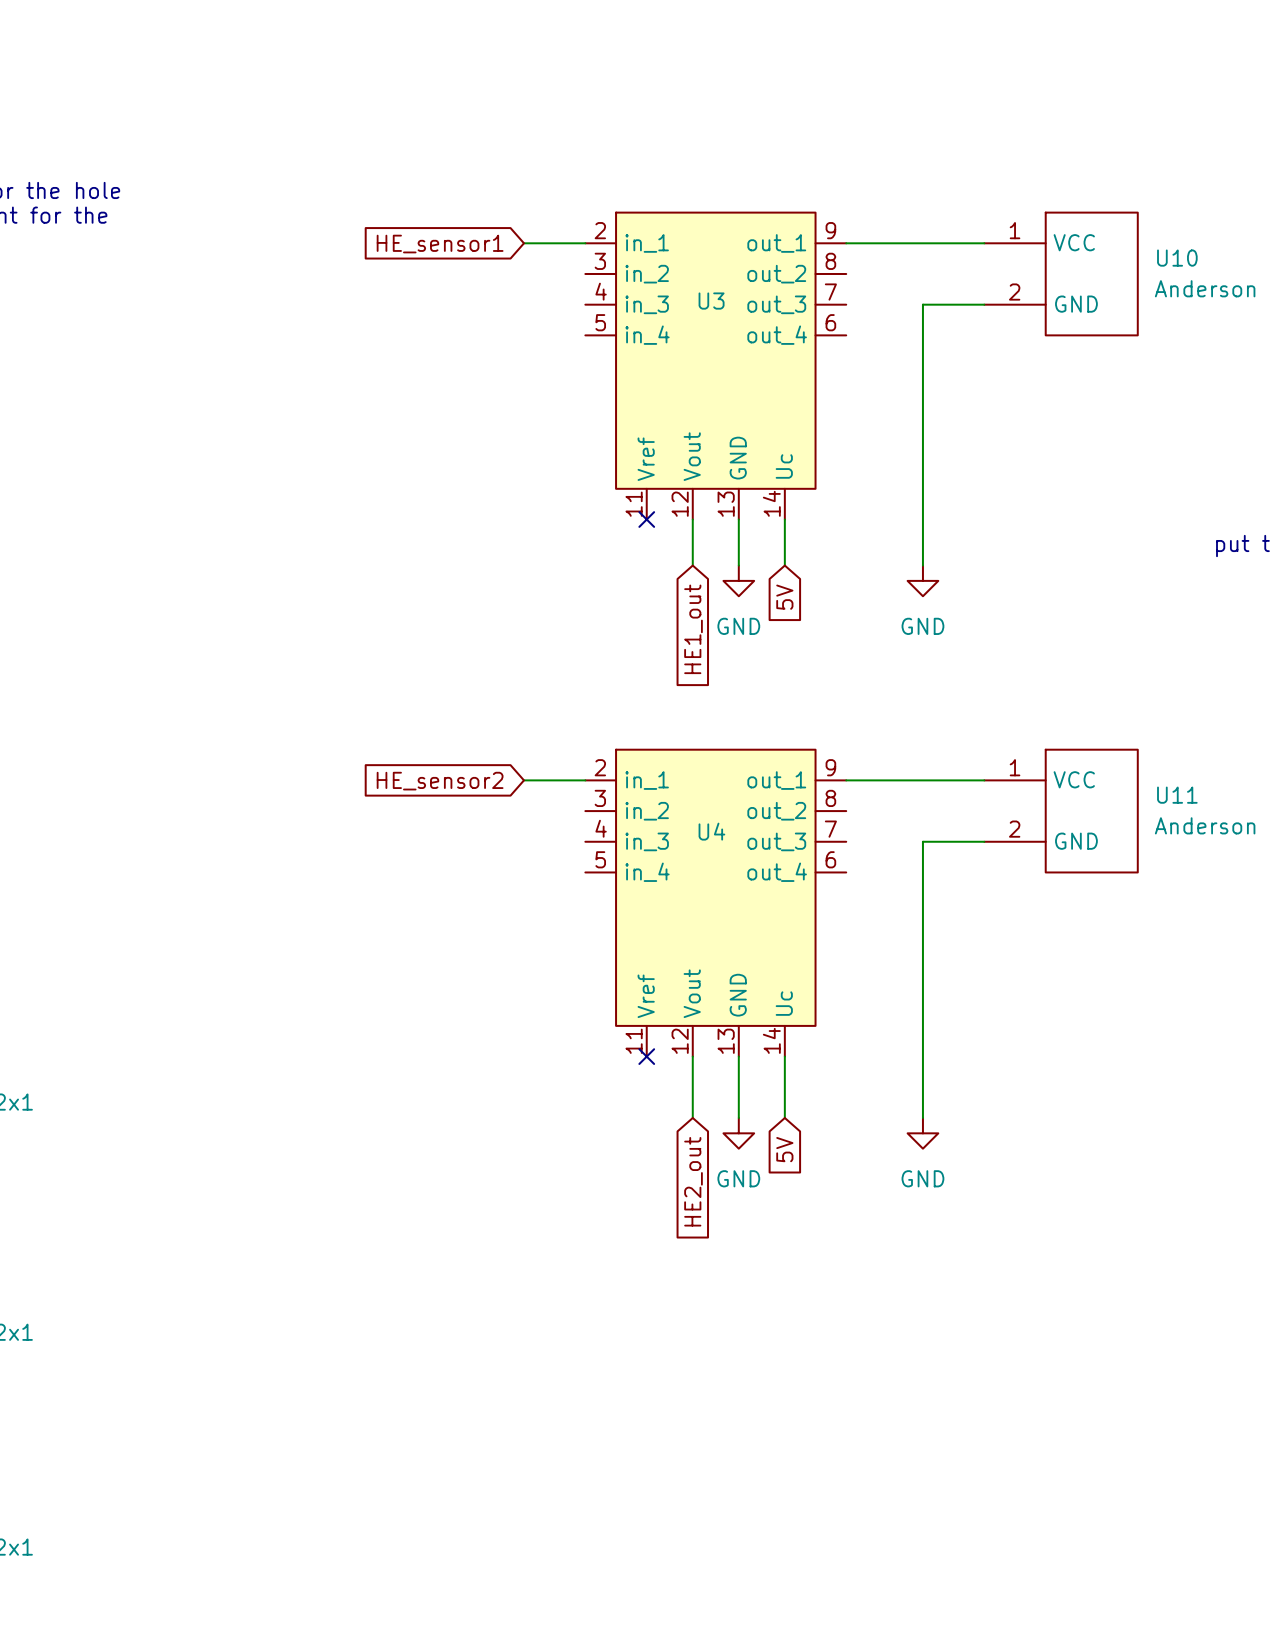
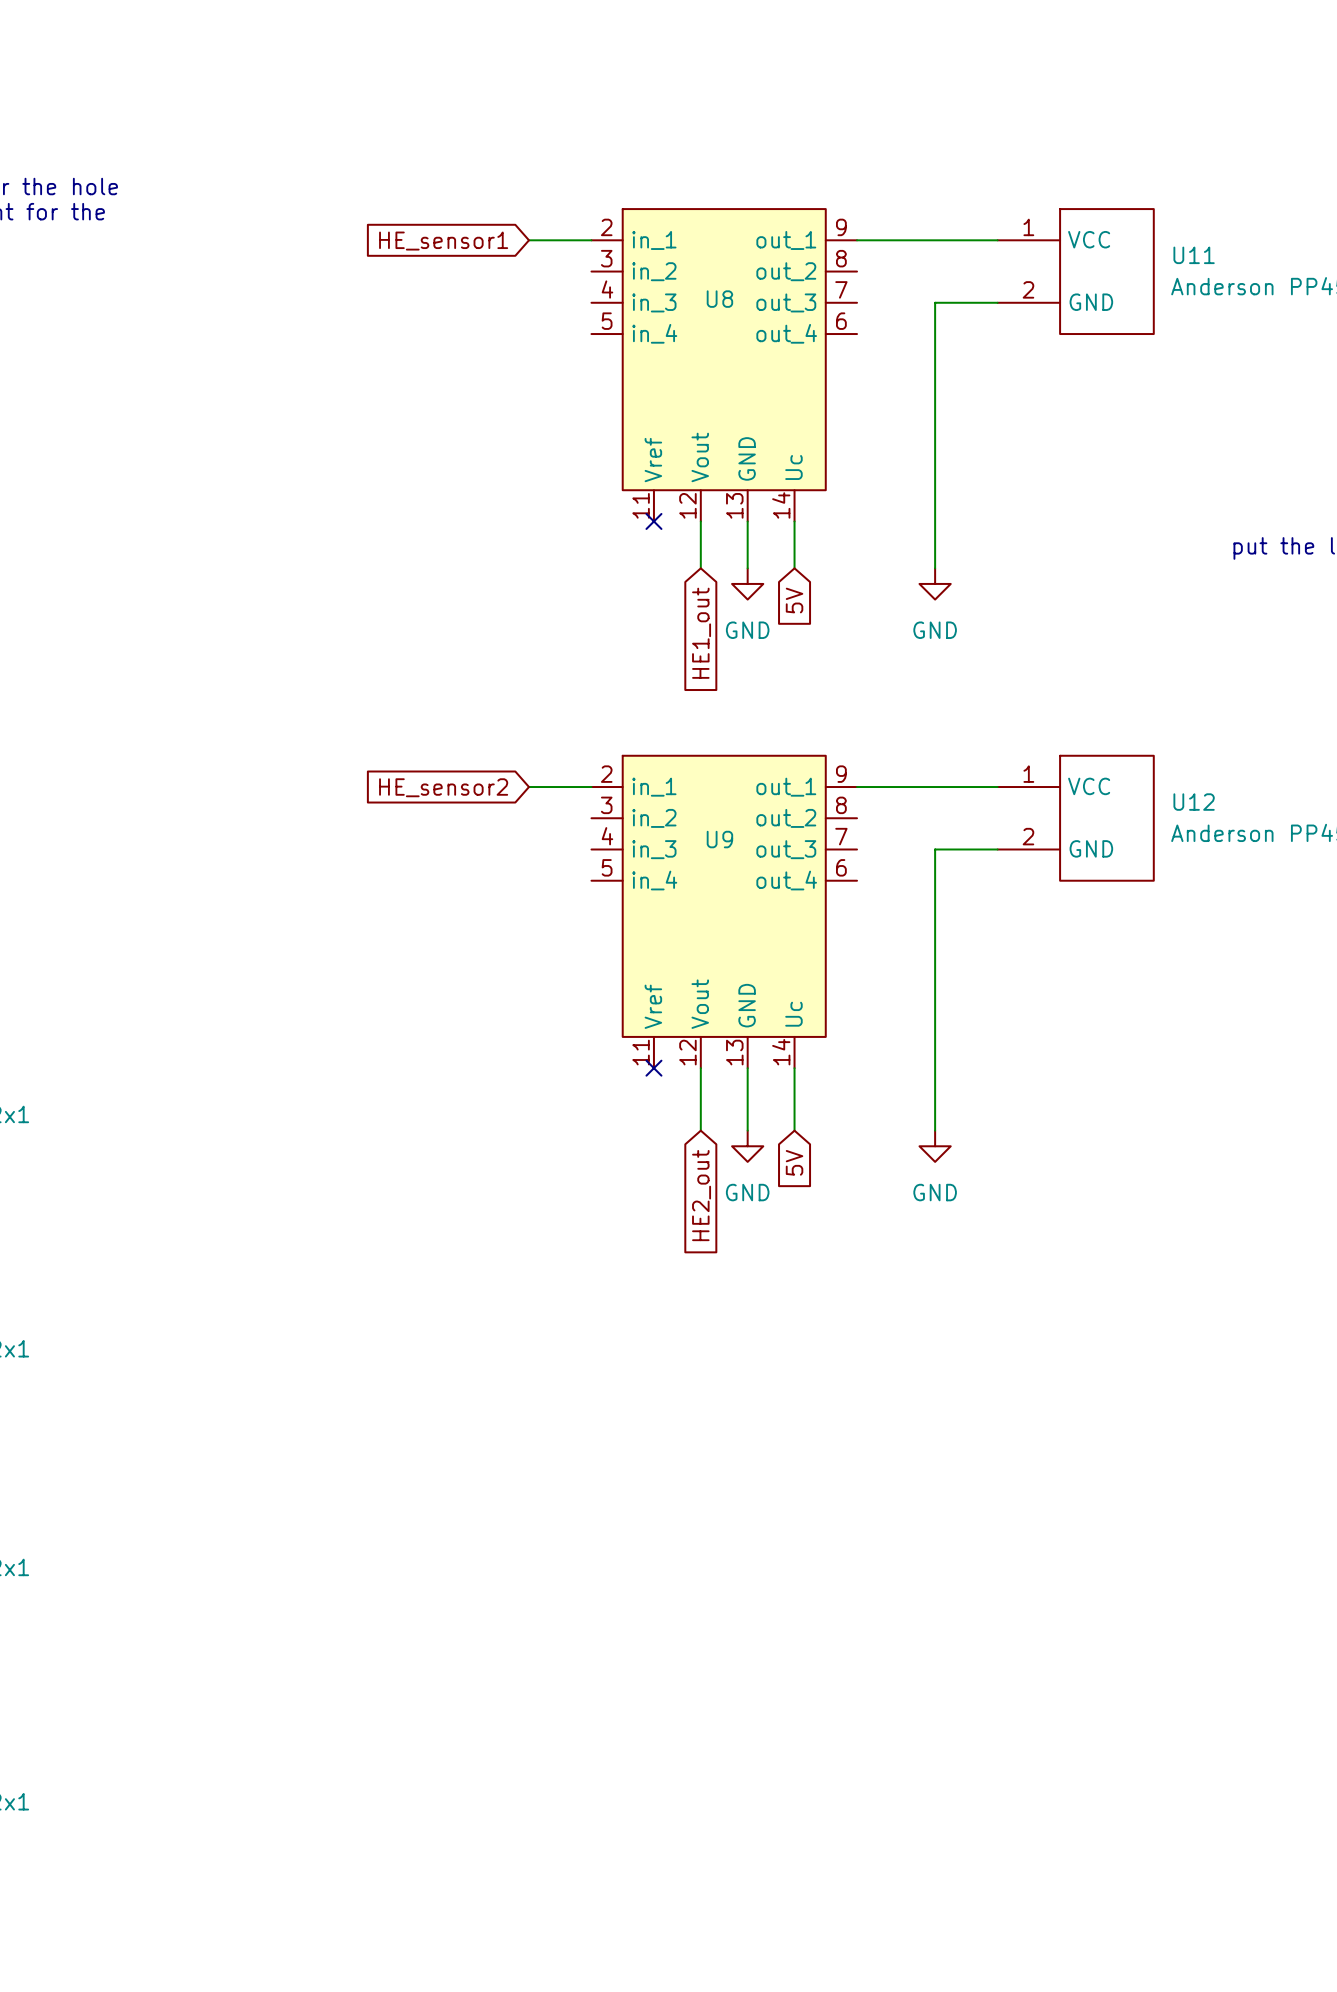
U10 name: U10 (1177, 258) -> U11 (1194, 255)
U3 name: U3 (711, 301) -> U8 (719, 299)
U11 name: U11 (1177, 795) -> U12 (1194, 802)
U4 name: U4 (711, 831) -> U9 (719, 839)

